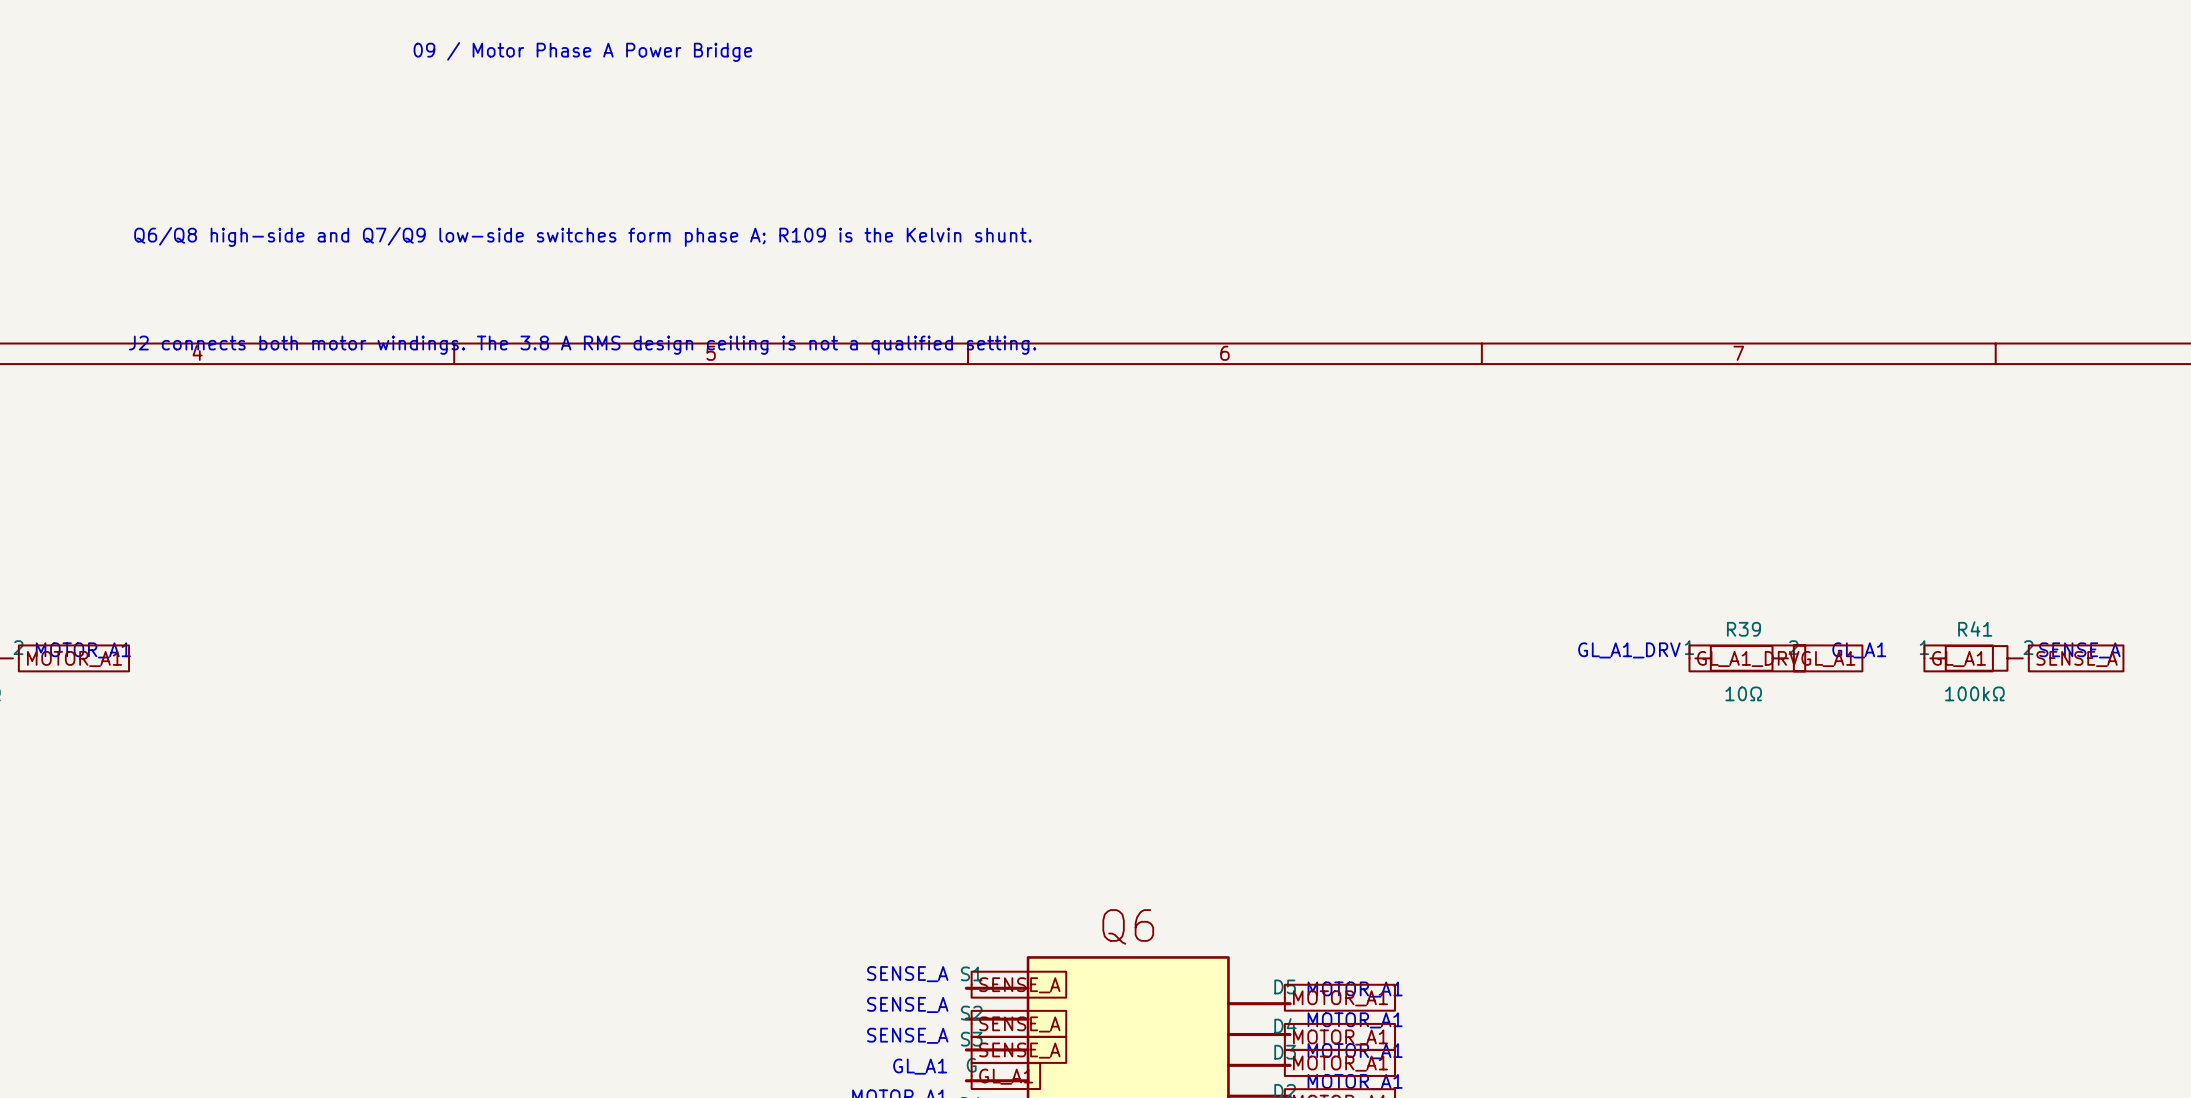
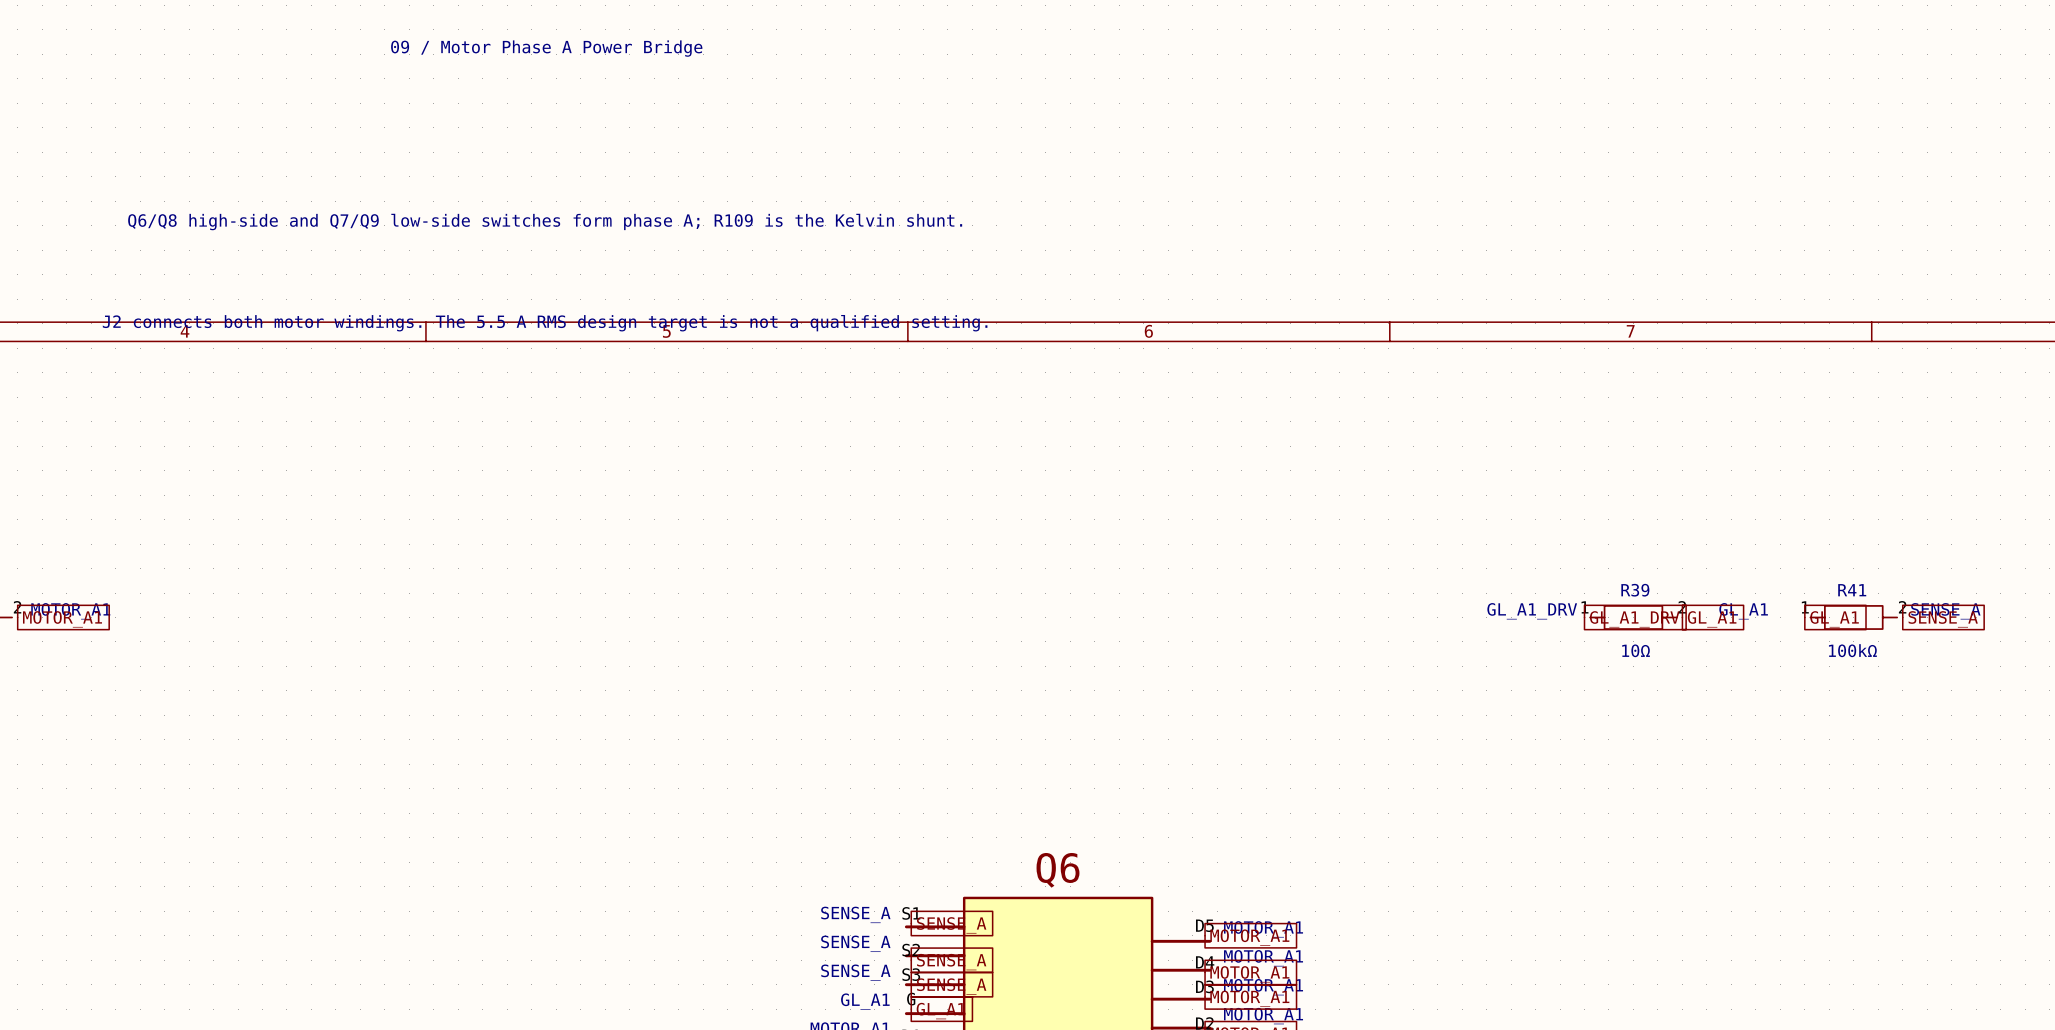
text: J2 connects both motor windings. The 3.8 A RMS design ceiling is not a qualified setting. (582, 345) -> J2 connects both motor windings. The 5.5 A RMS design target is not a qualified setting. (545, 323)

